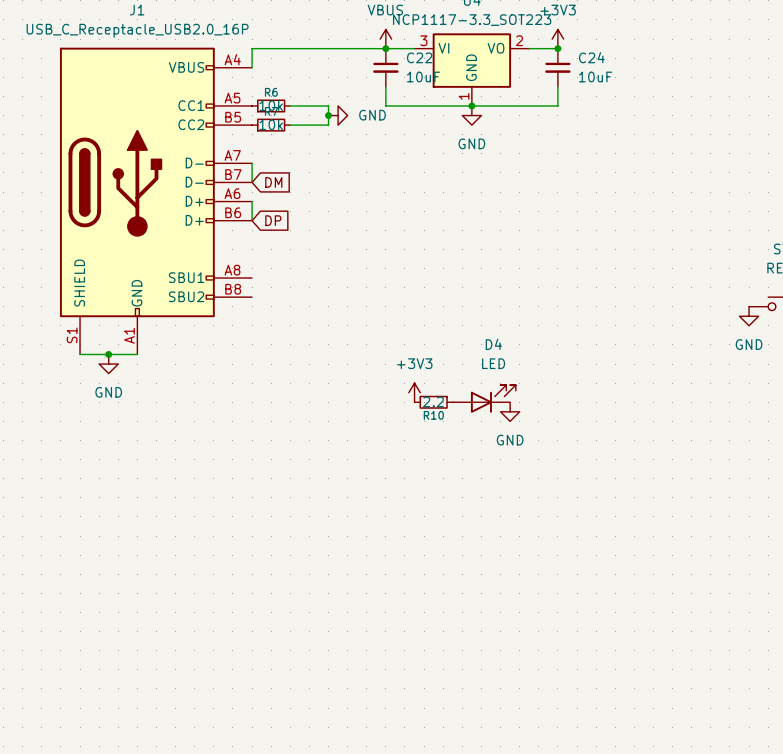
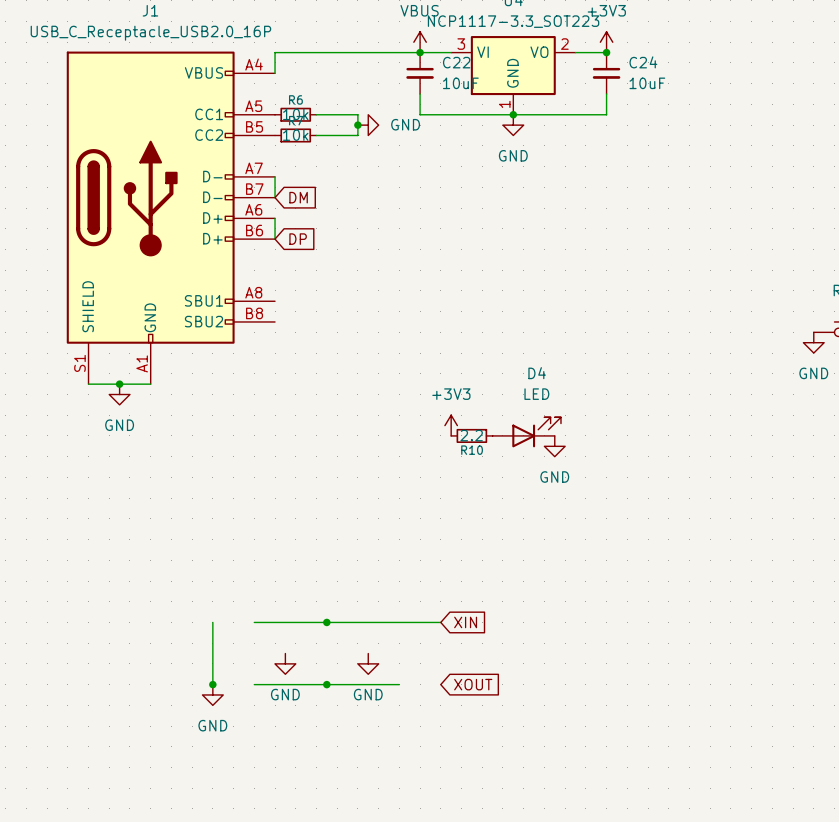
wire: none -> (212, 622) (212, 684)
wire: none -> (254, 622) (440, 622)
junction: none -> (326, 622)
global label: none -> XIN (465, 622)
power symbol: none -> GND (285, 663)
power symbol: none -> GND (368, 663)
junction: none -> (212, 684)
wire: none -> (254, 684) (399, 684)
junction: none -> (326, 684)
global label: none -> XOUT (473, 684)
power symbol: none -> GND (212, 694)

